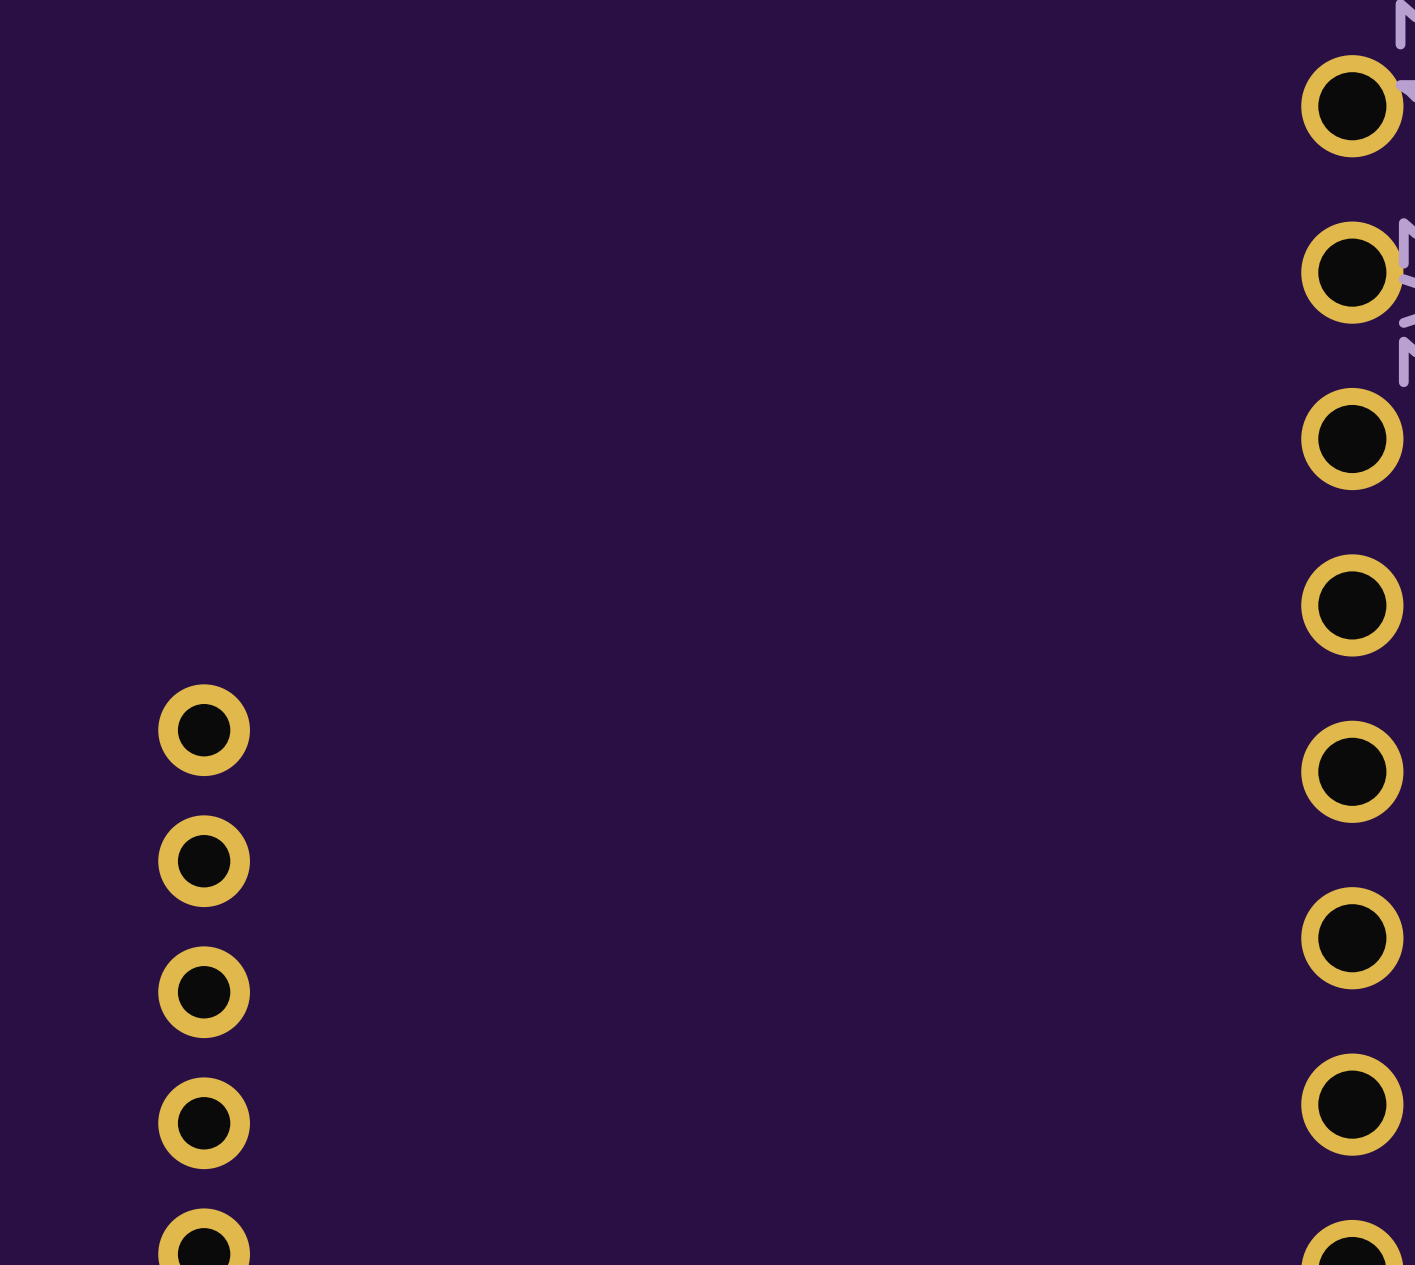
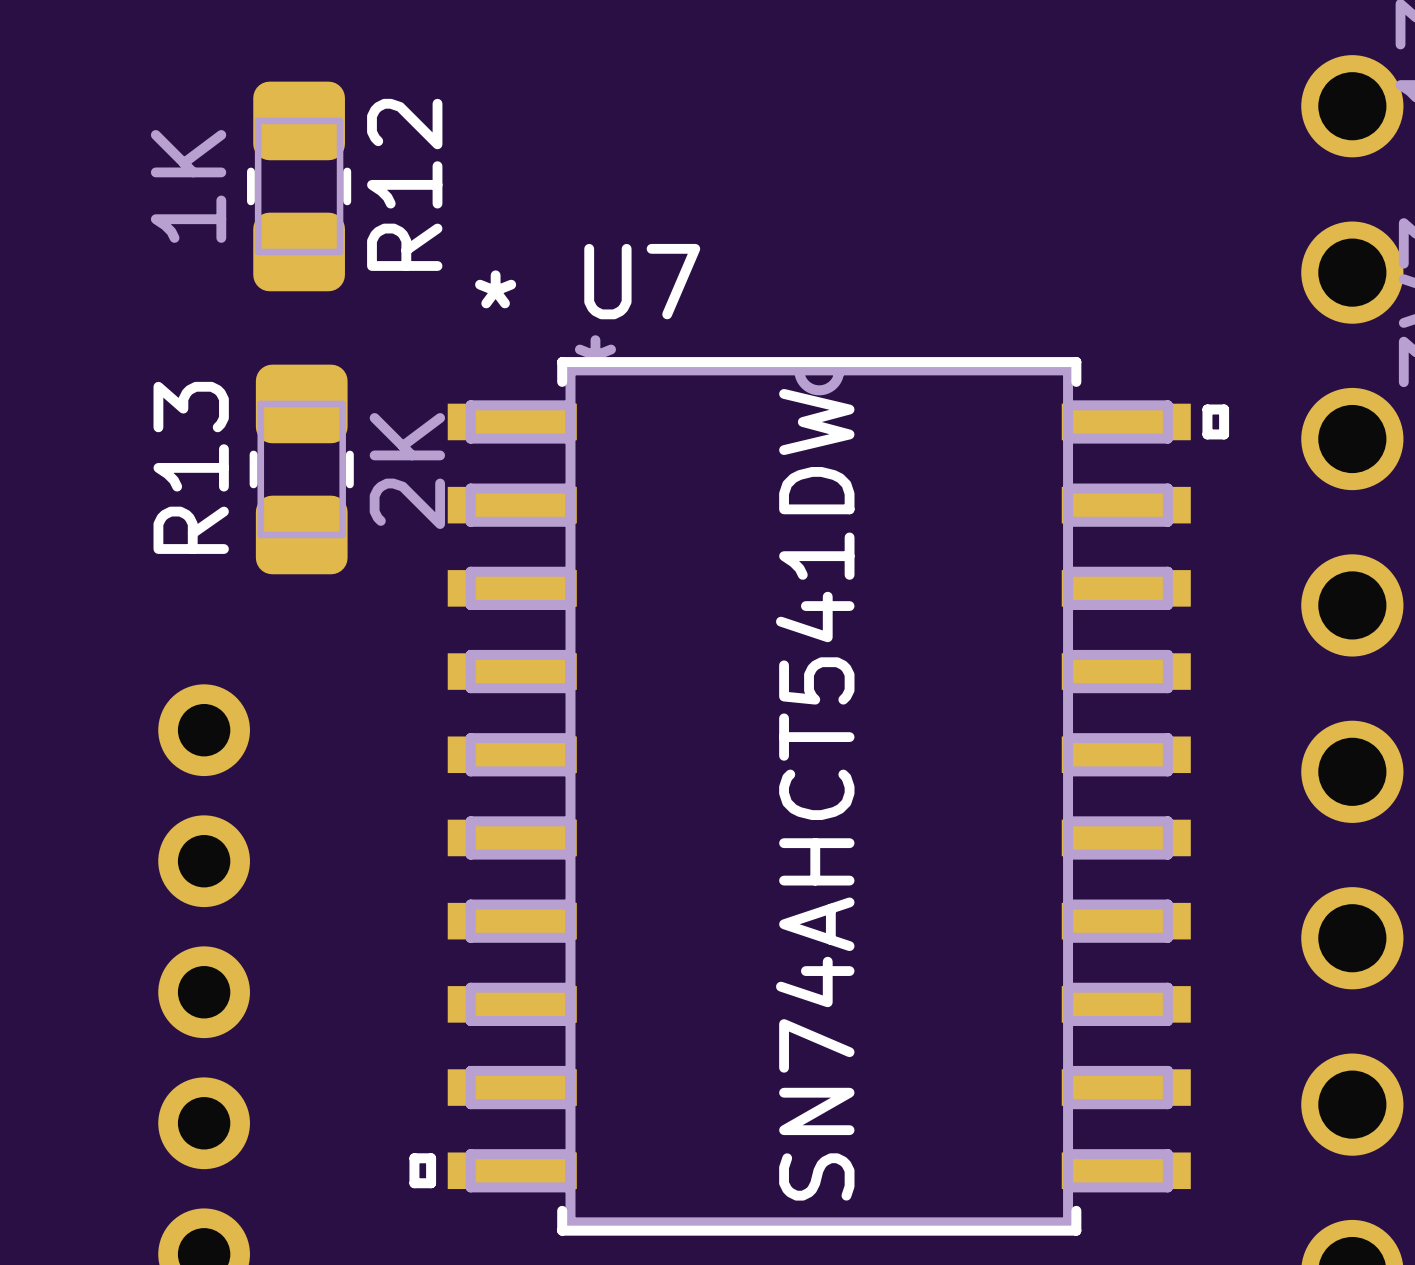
R12: none -> 1K (299, 186)
R13: none -> 2K (301, 469)
U7: none -> SN74AHCT541DW (819, 796)

